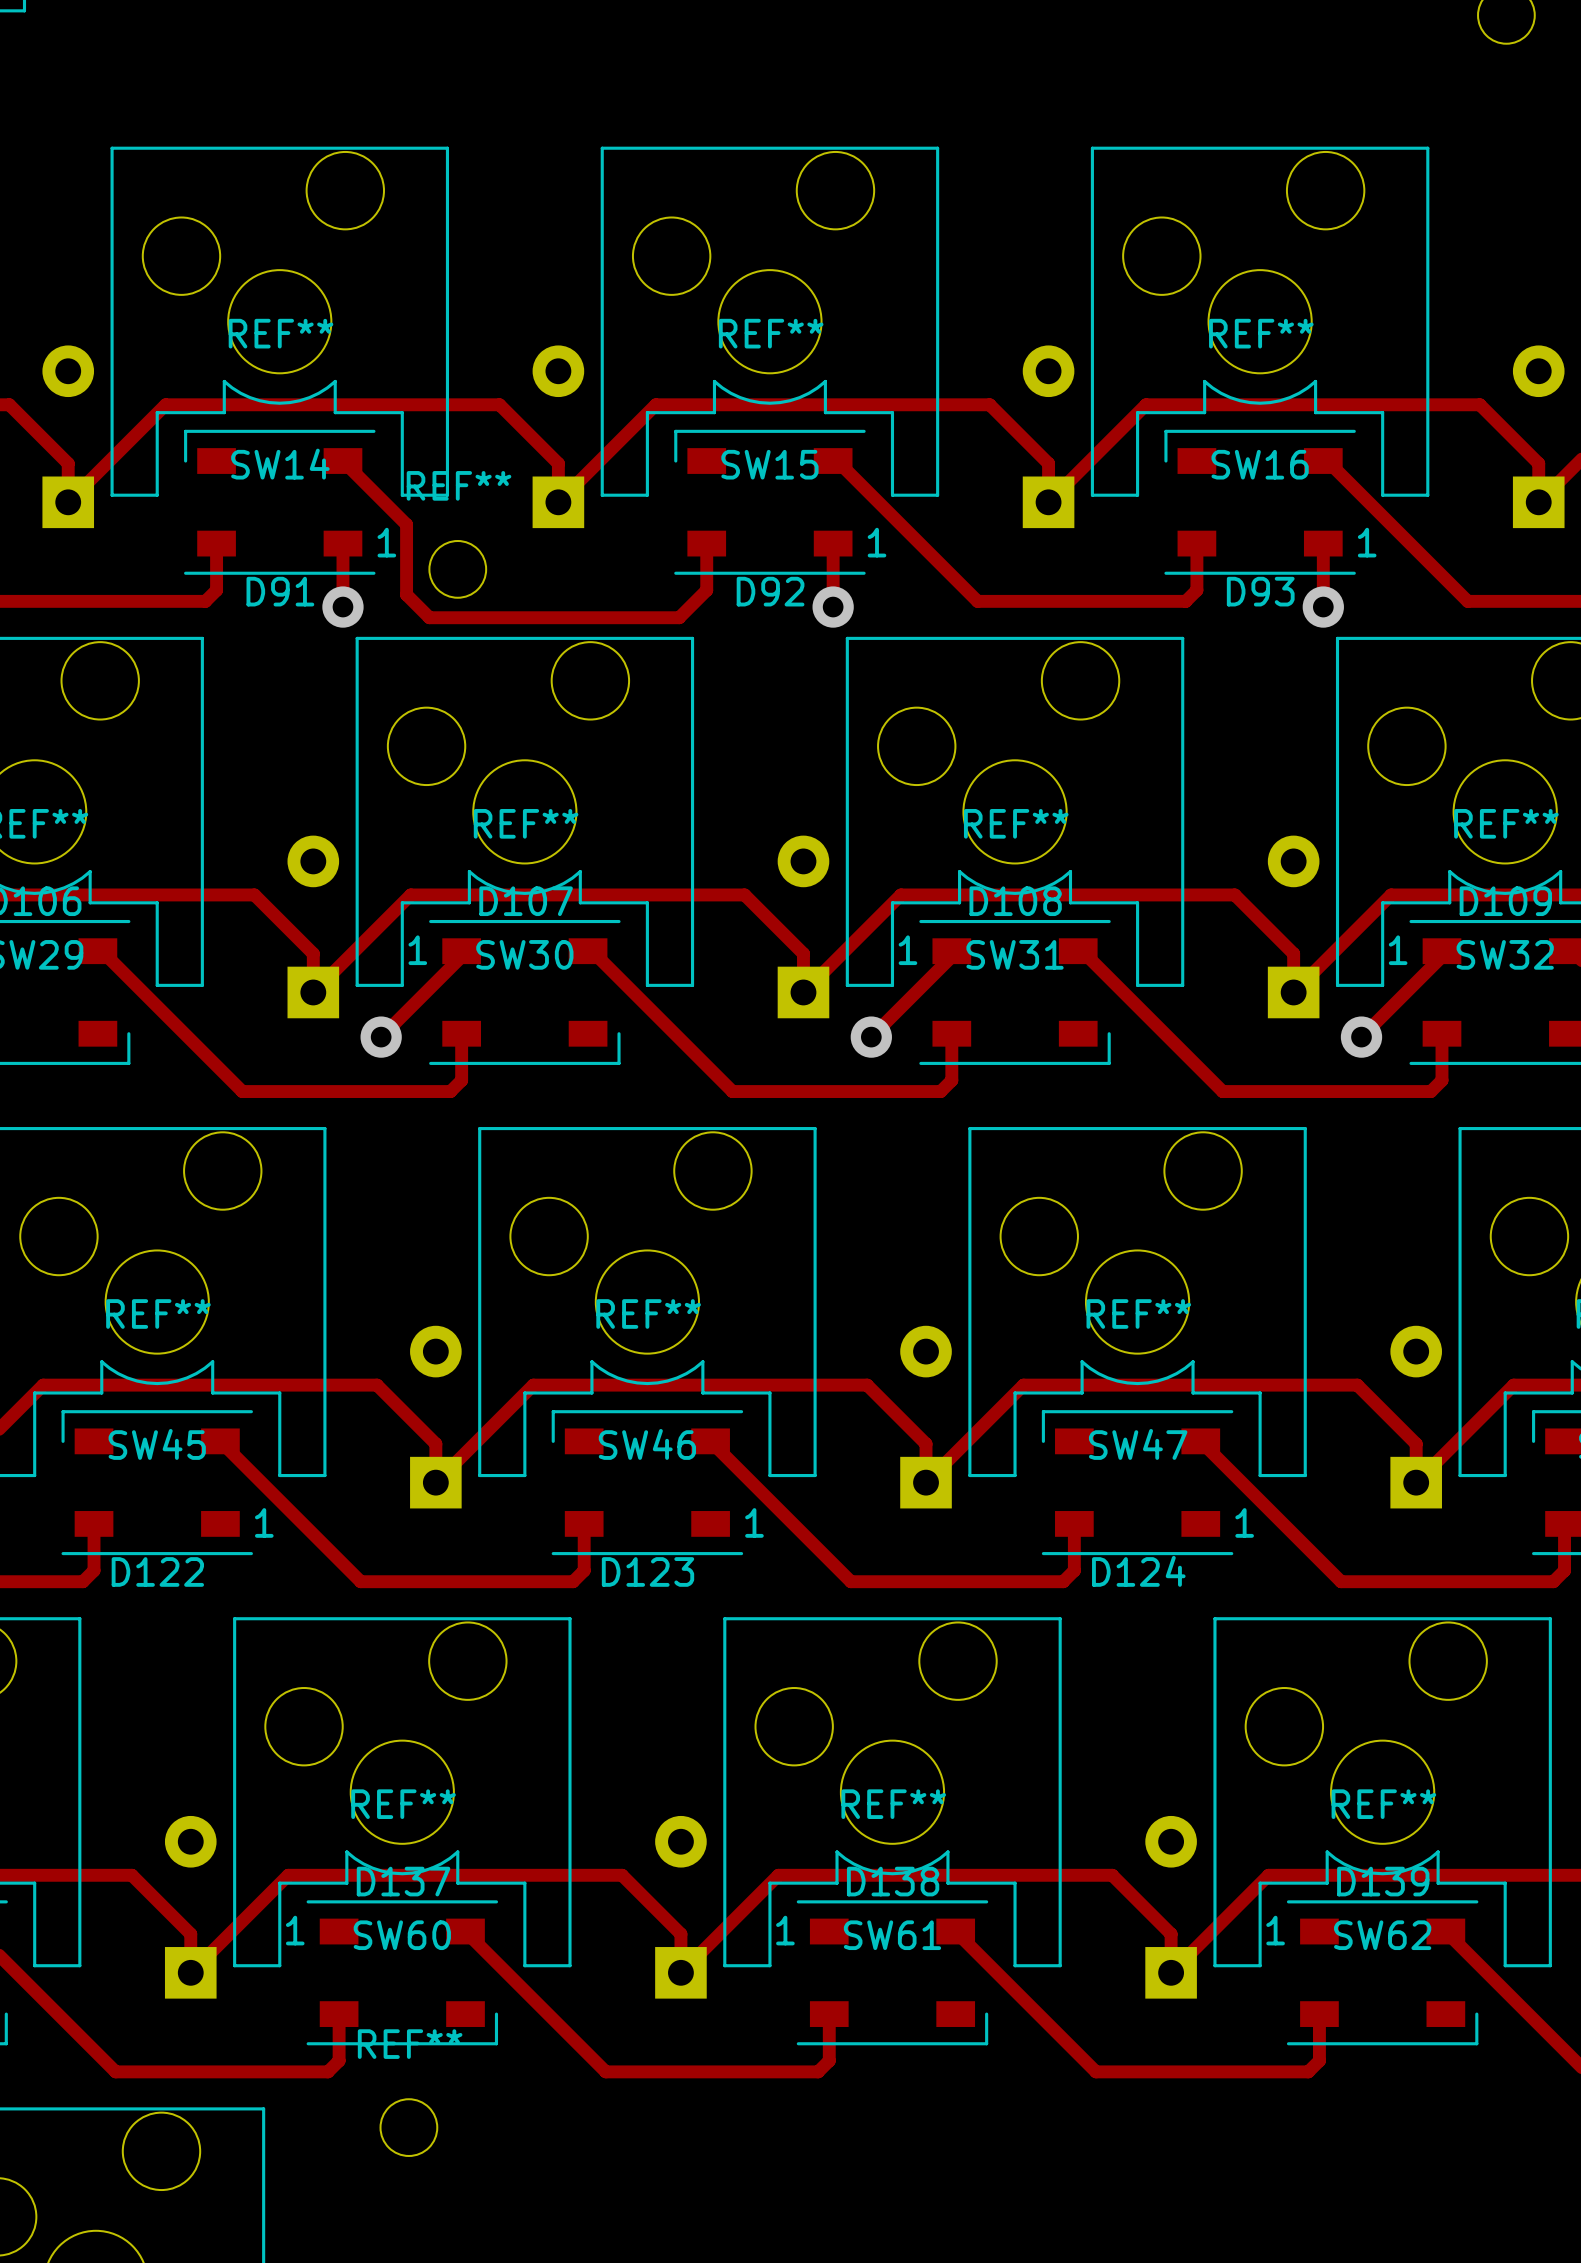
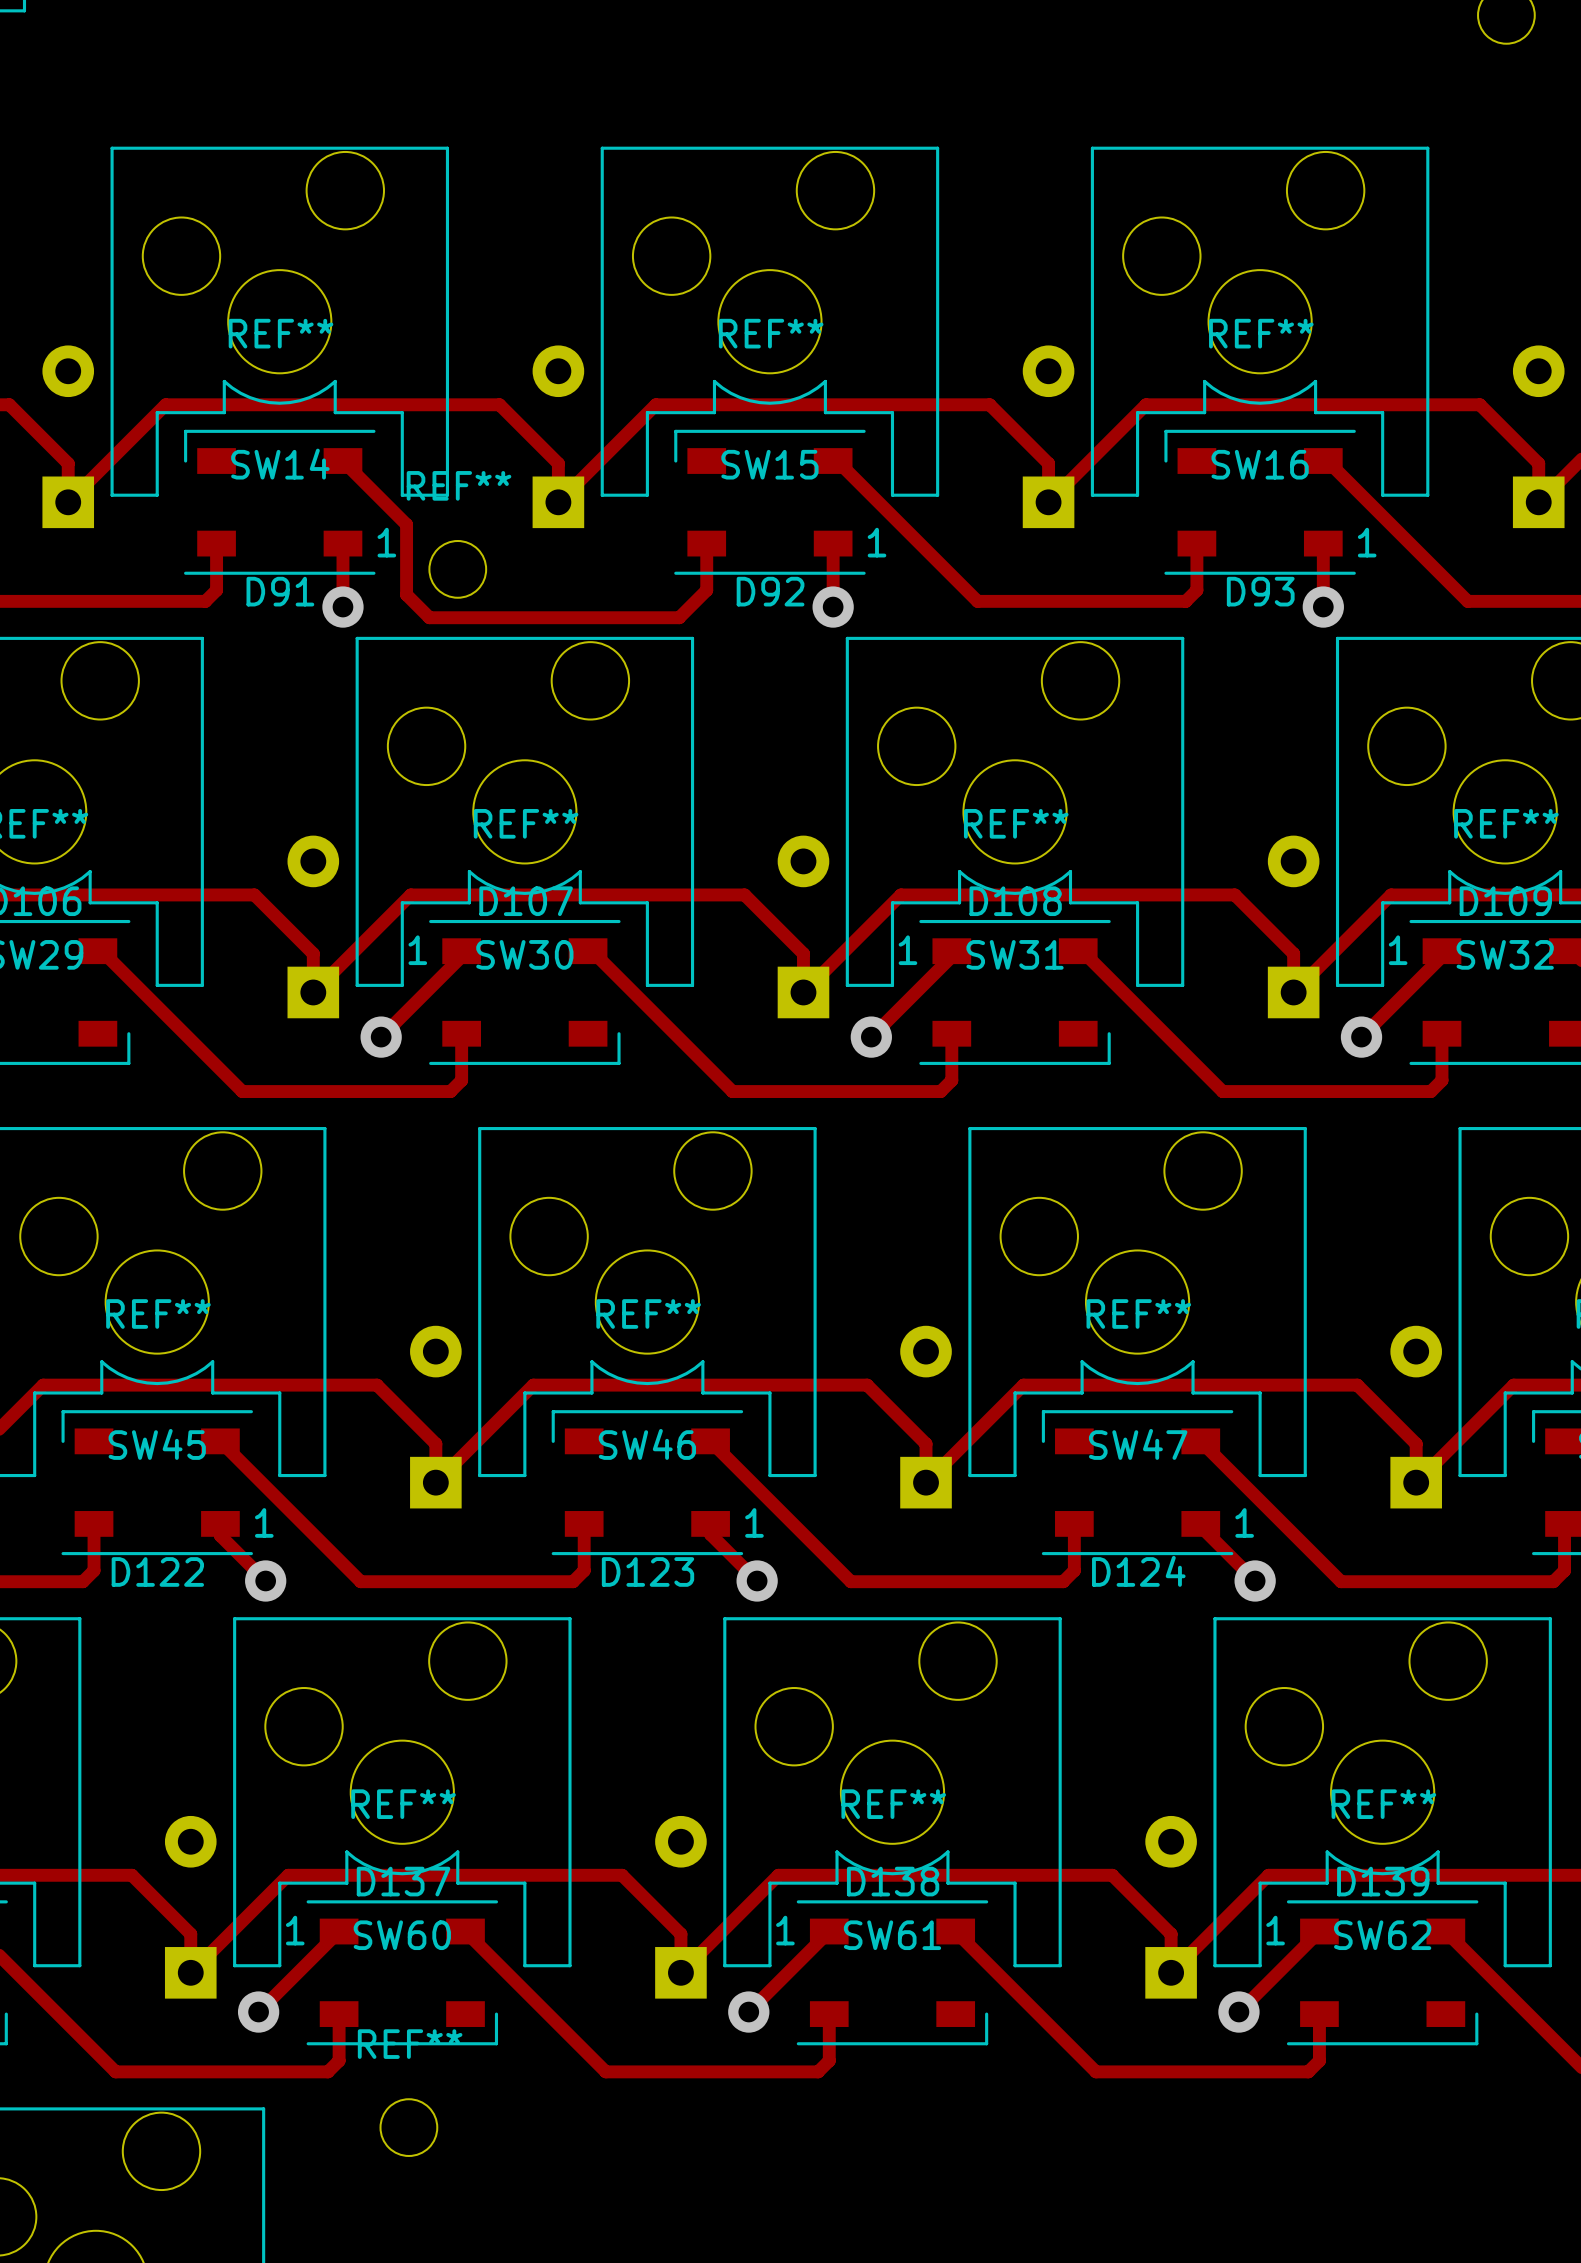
track: none -> (220, 1523) (220, 1535) (265, 1580)
track: none -> (710, 1523) (710, 1534) (757, 1580)
track: none -> (1200, 1523) (1200, 1526) (1255, 1580)
via: none -> (265, 1580)
via: none -> (757, 1580)
via: none -> (1255, 1580)
track: none -> (339, 1931) (258, 2012)
track: none -> (829, 1931) (748, 2012)
track: none -> (1319, 1931) (1238, 2012)
via: none -> (258, 2012)
via: none -> (748, 2012)
via: none -> (1238, 2012)

